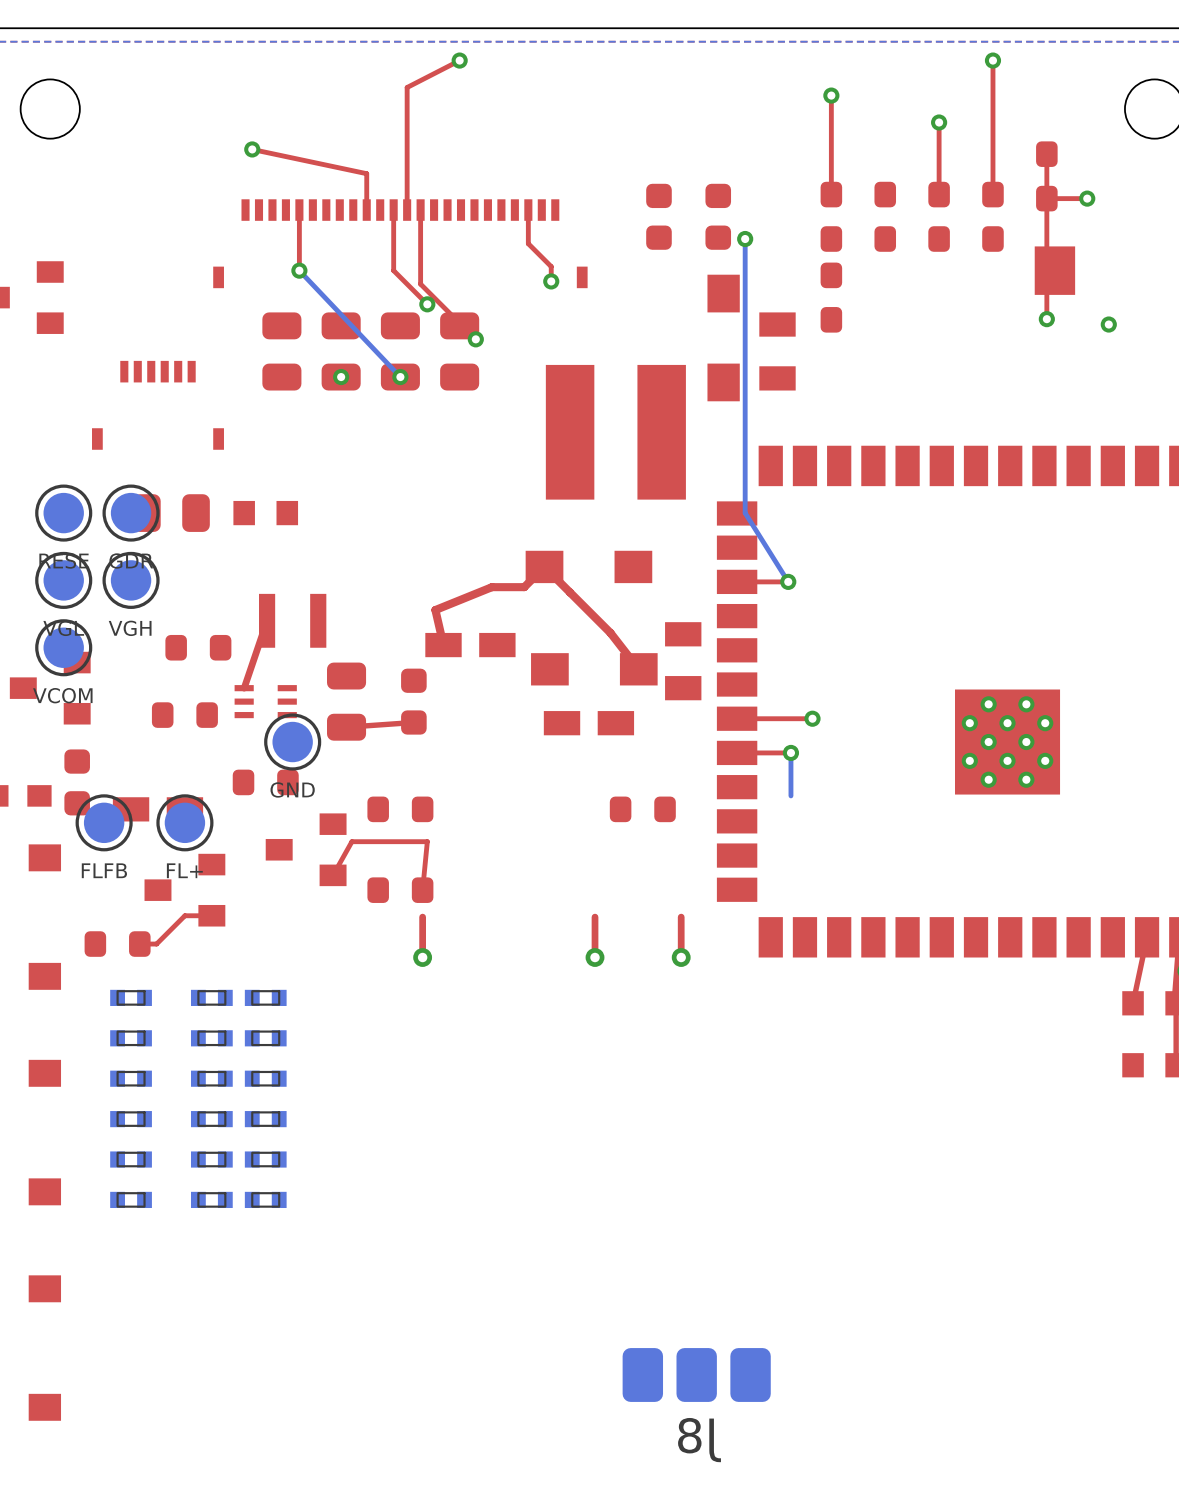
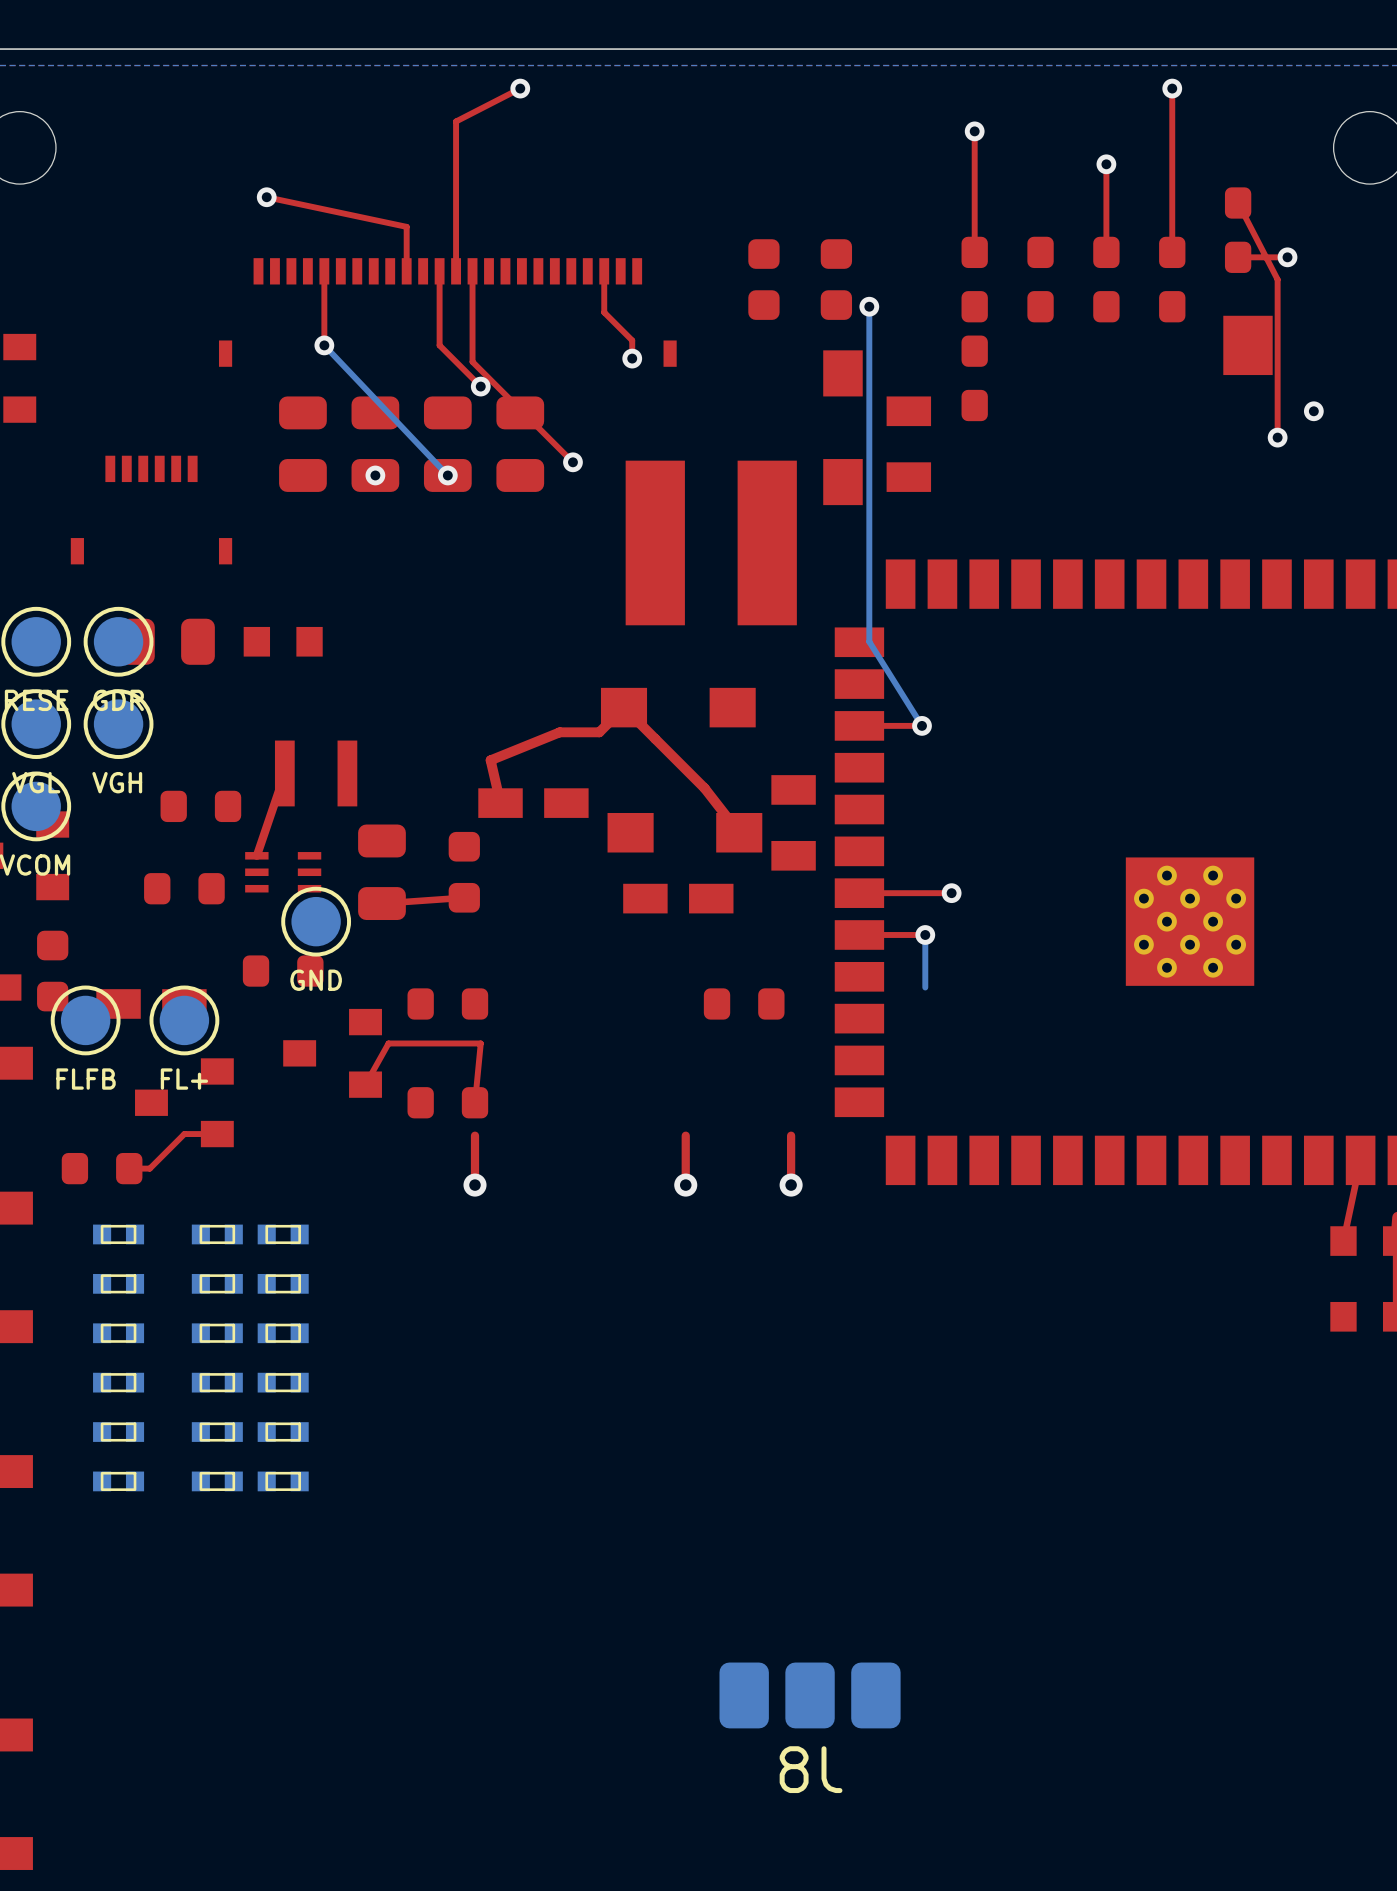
top track: (1046, 154) (1046, 319) -> (1238, 202) (1277, 279) (1277, 437)
via position: (1046, 319) -> (1277, 437)
top track: none -> (540, 429) (572, 462)
via position: (475, 339) -> (572, 462)

